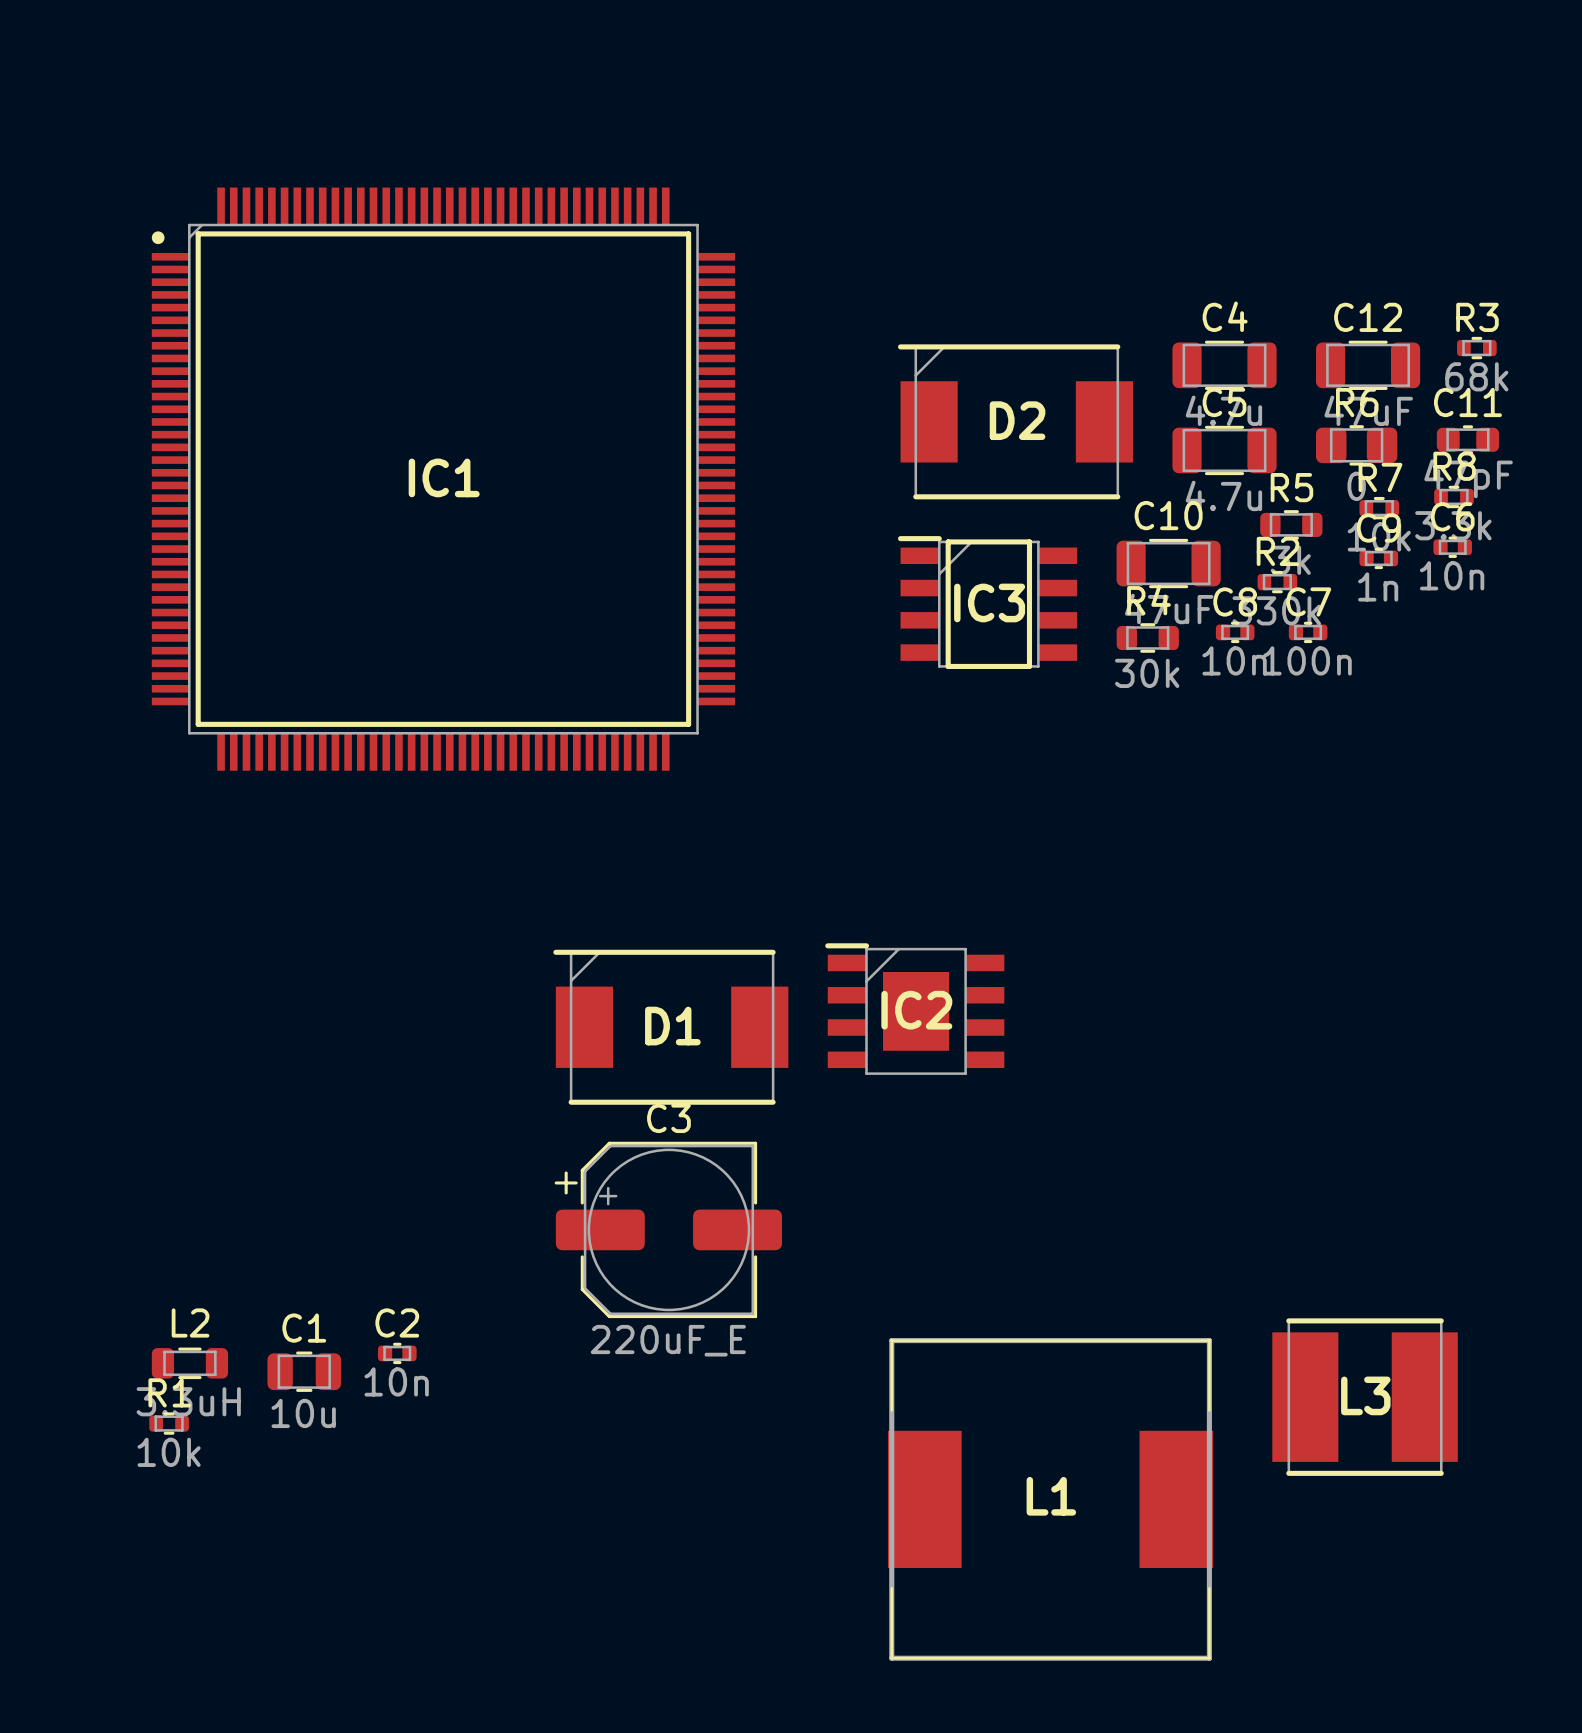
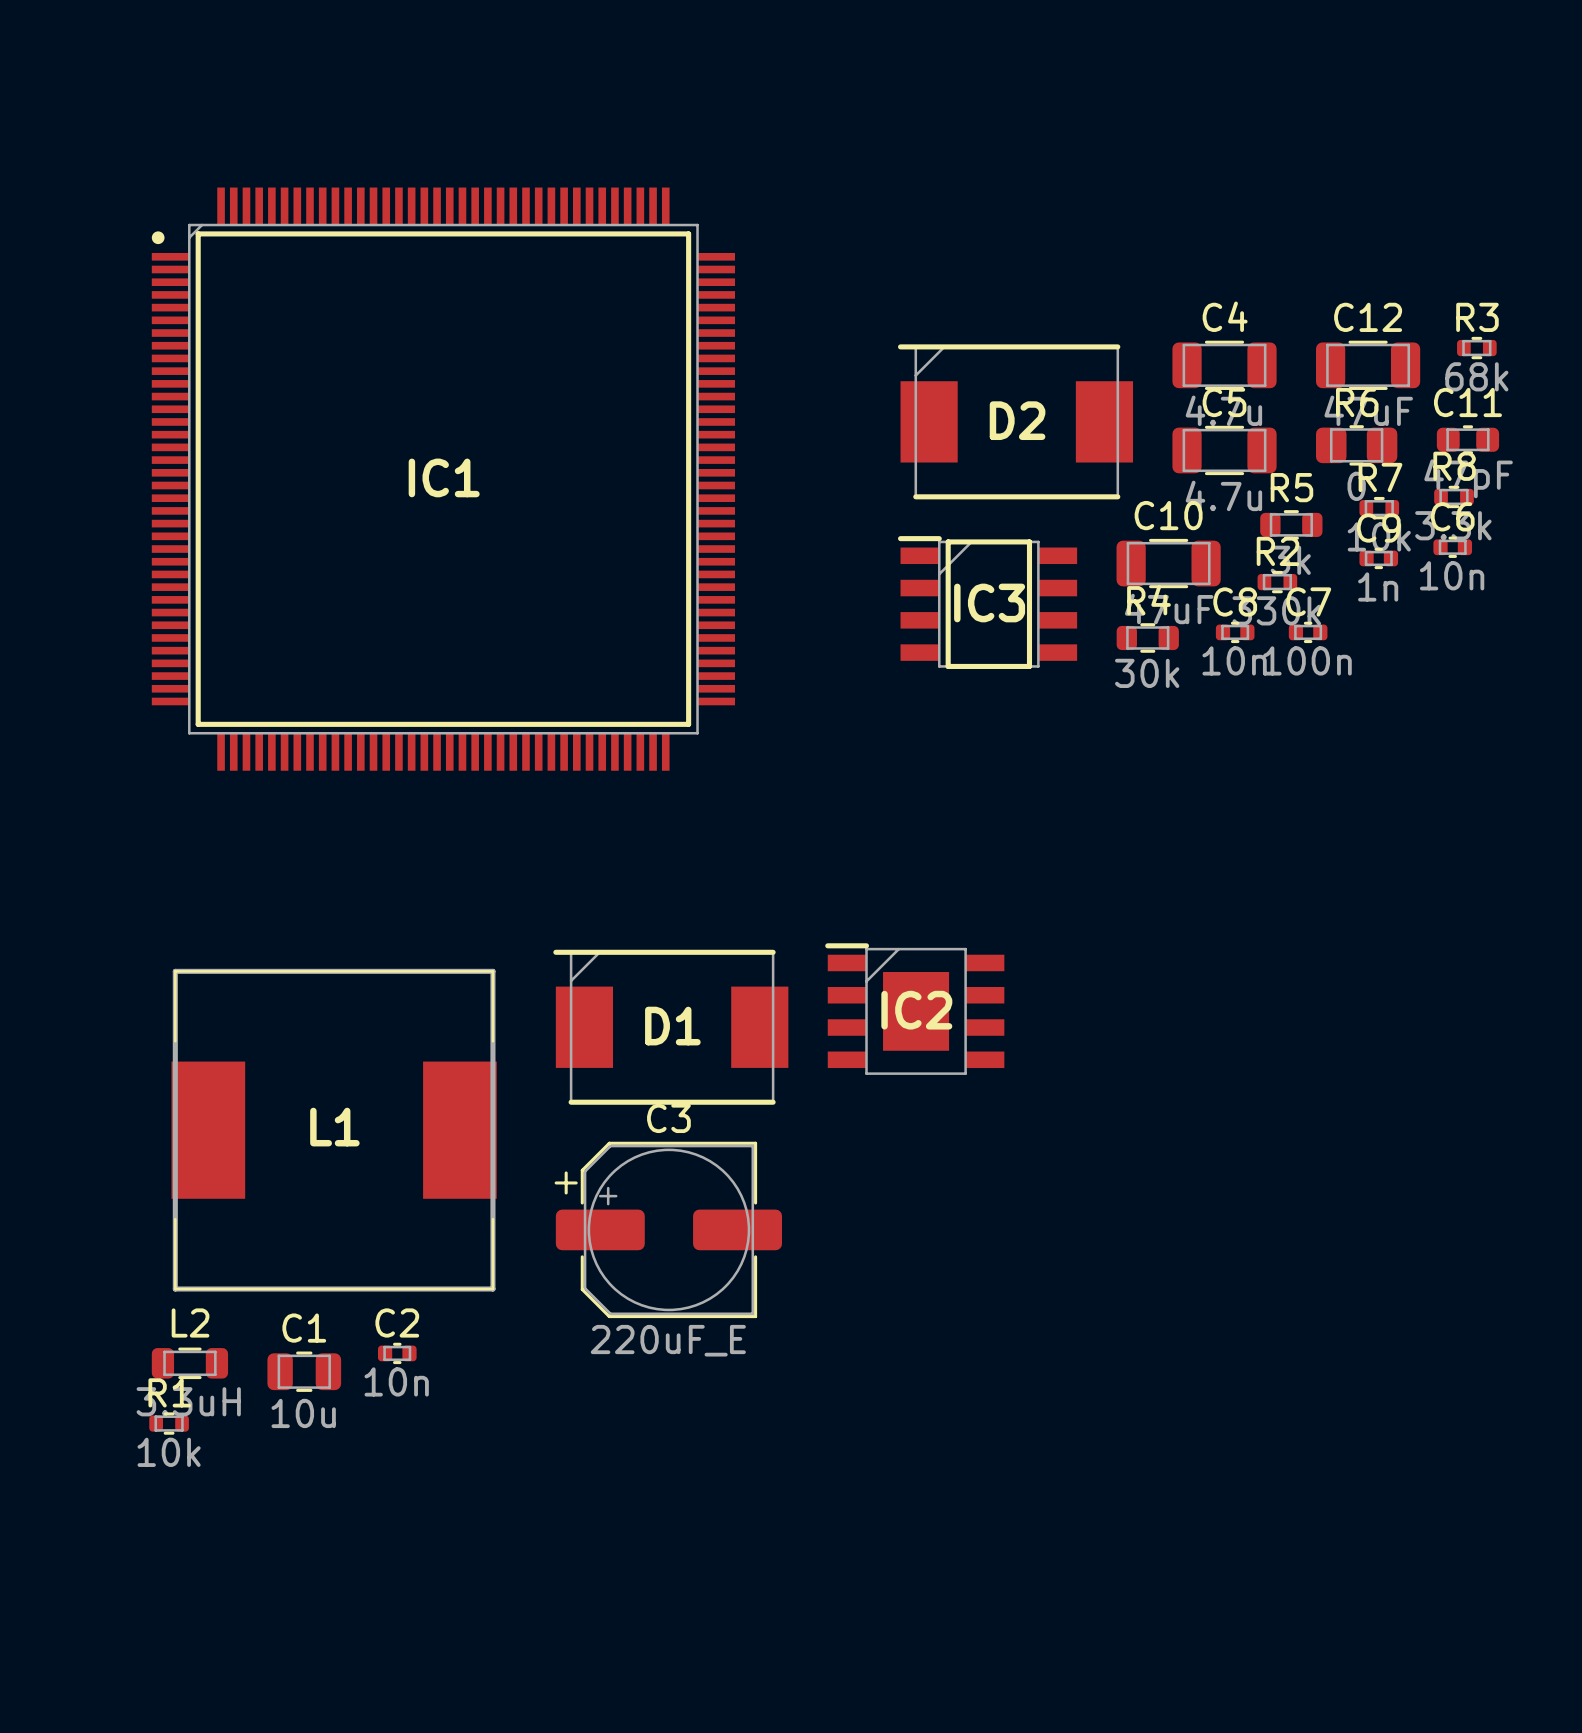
L3: (1365, 1397) -> none
L1 position: (1050, 1499) -> (334, 1130)

